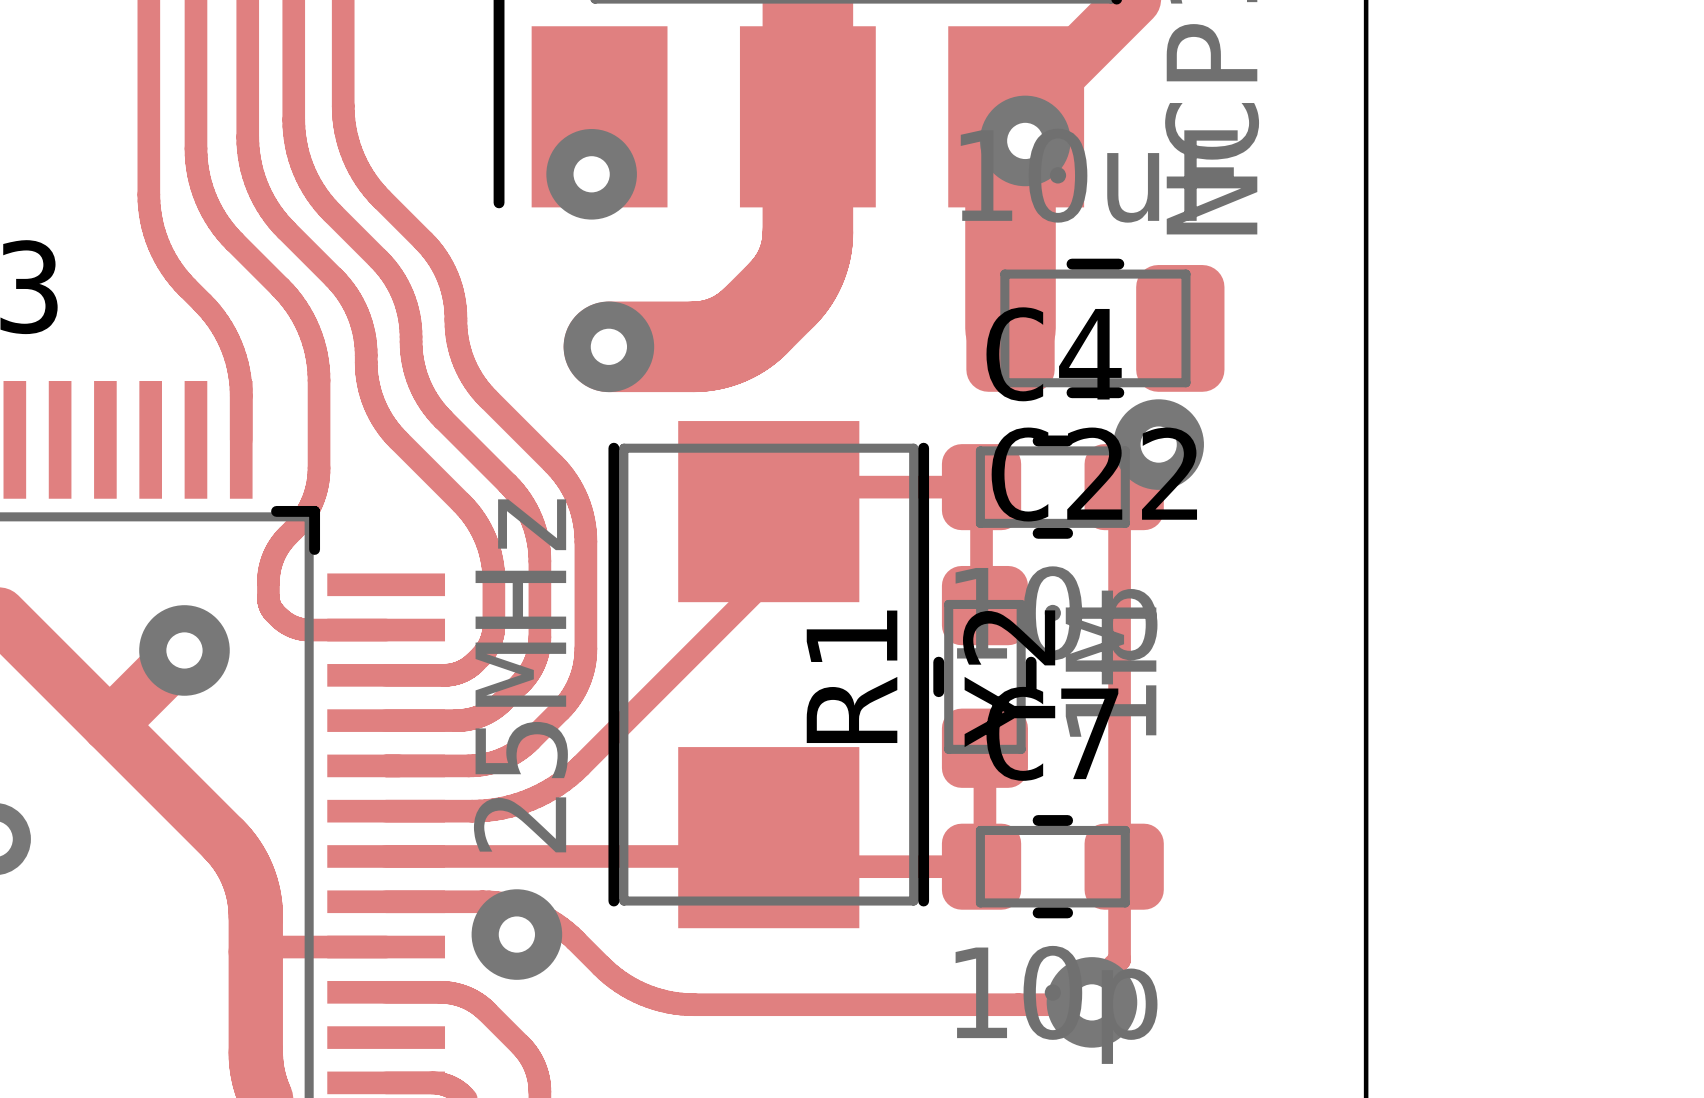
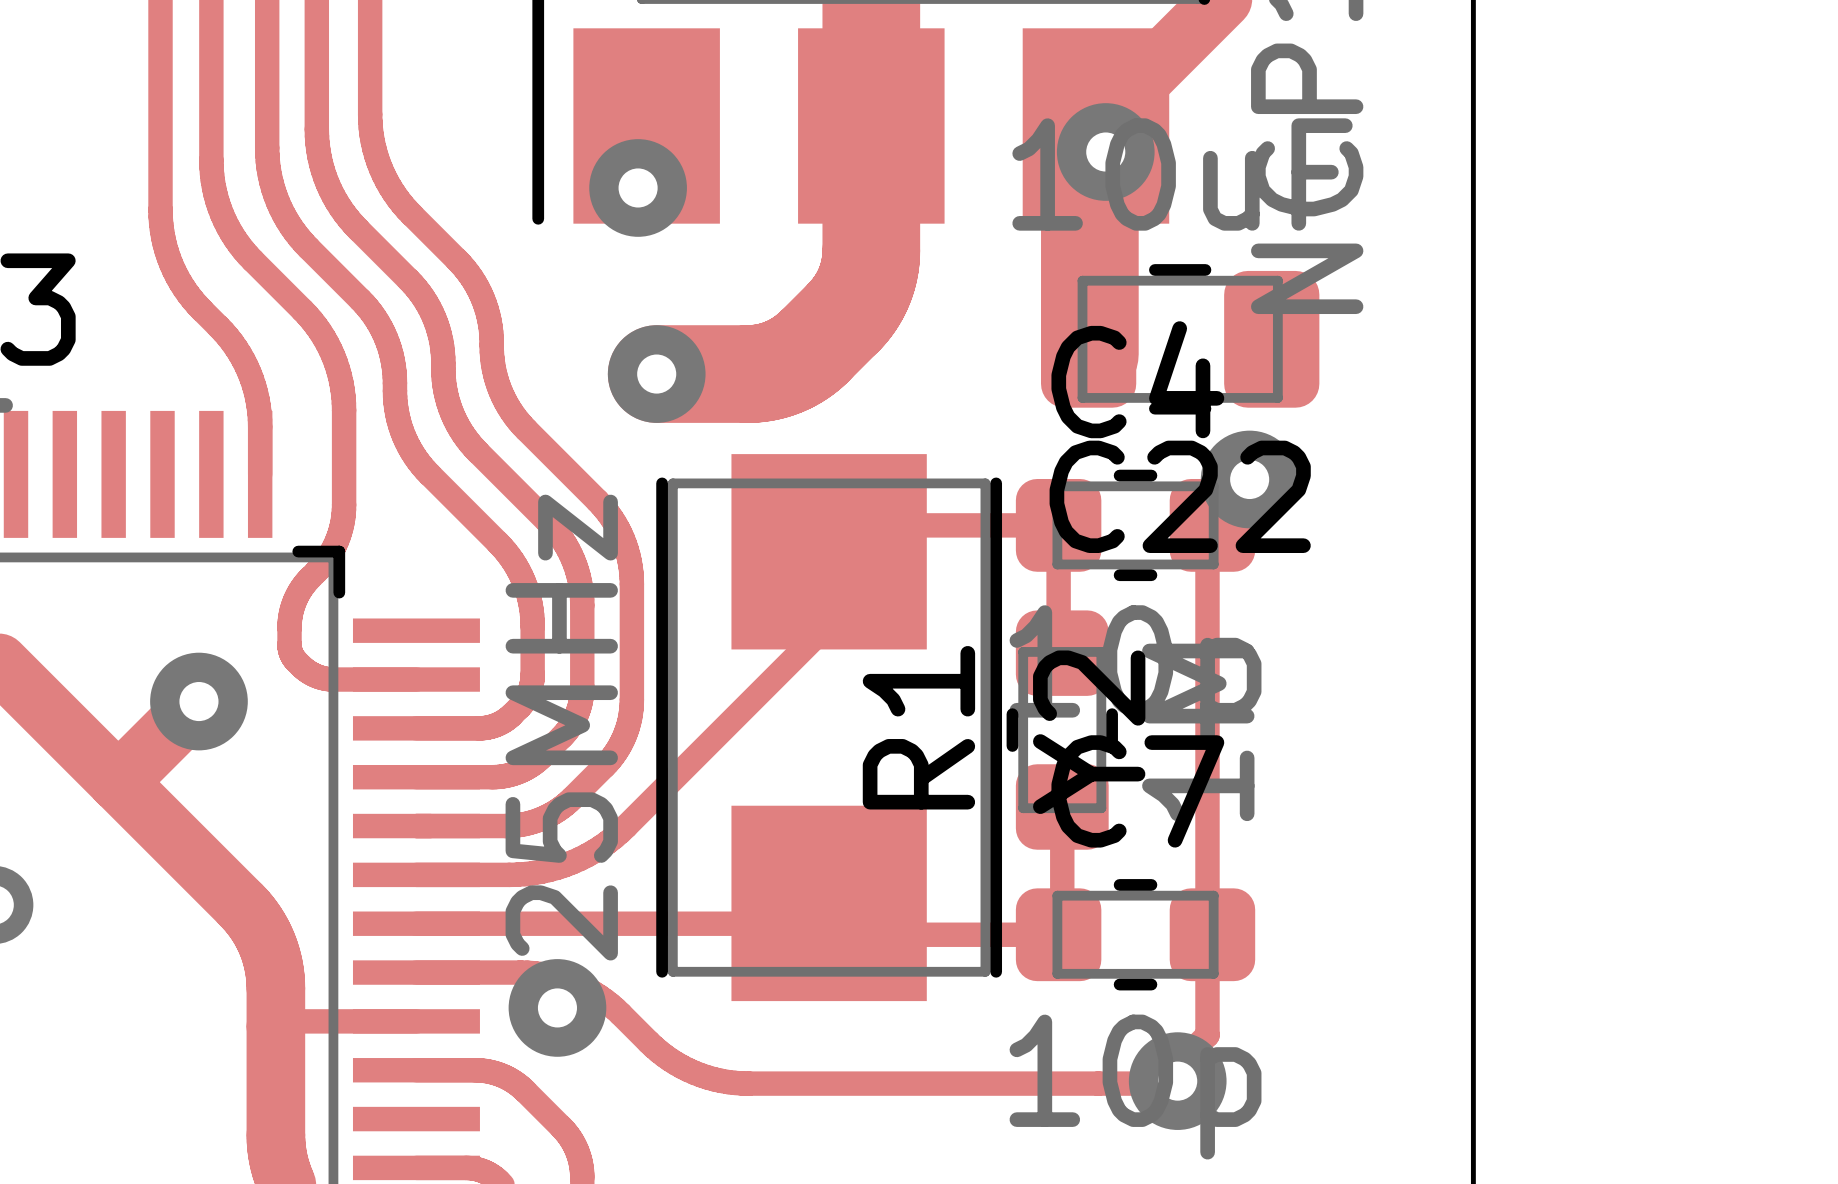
C22 position: (1095, 328) -> (1180, 339)

